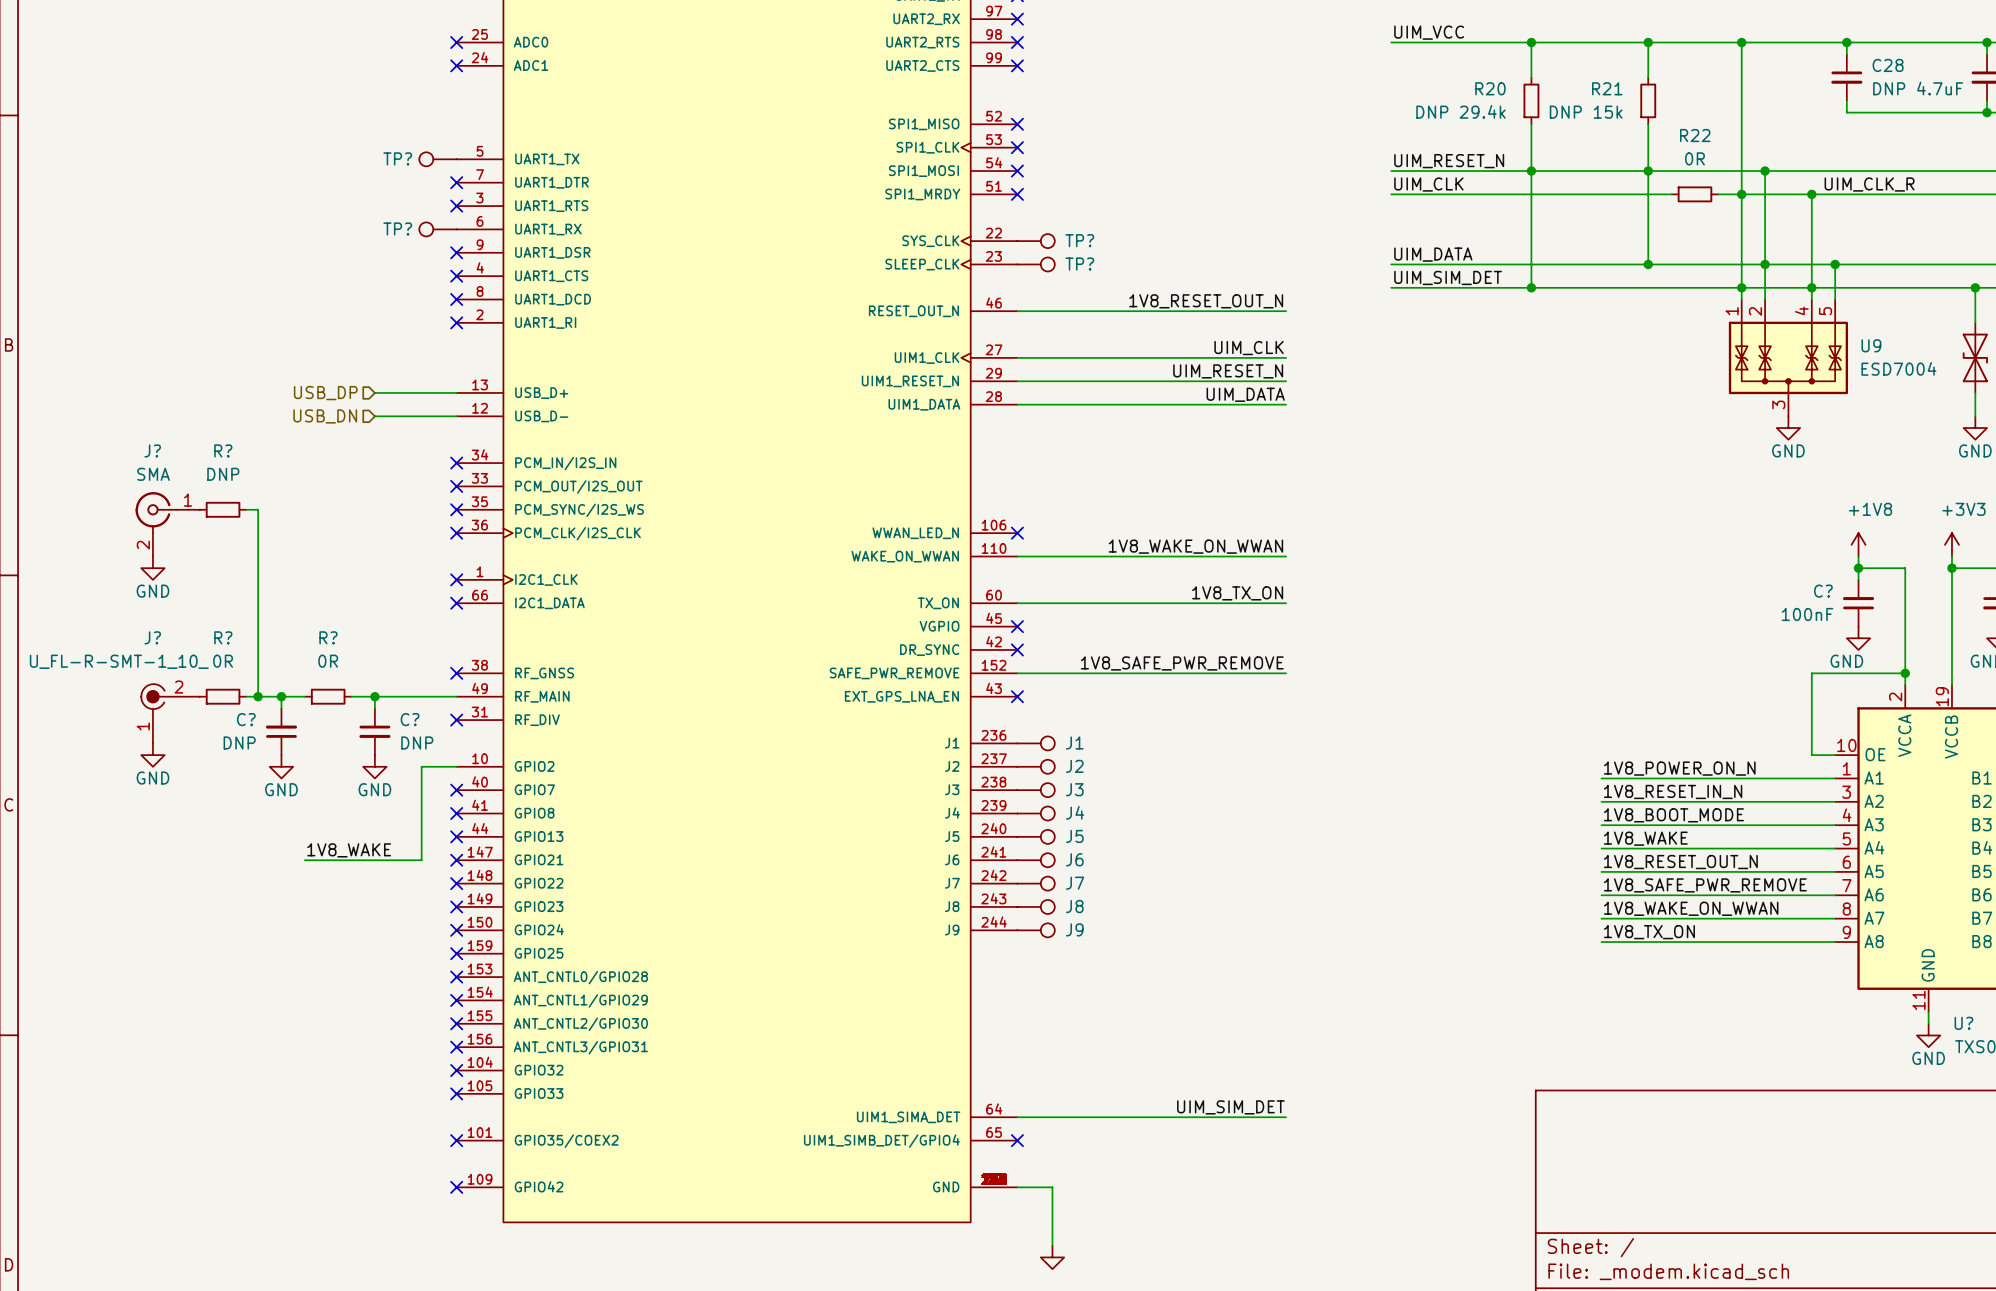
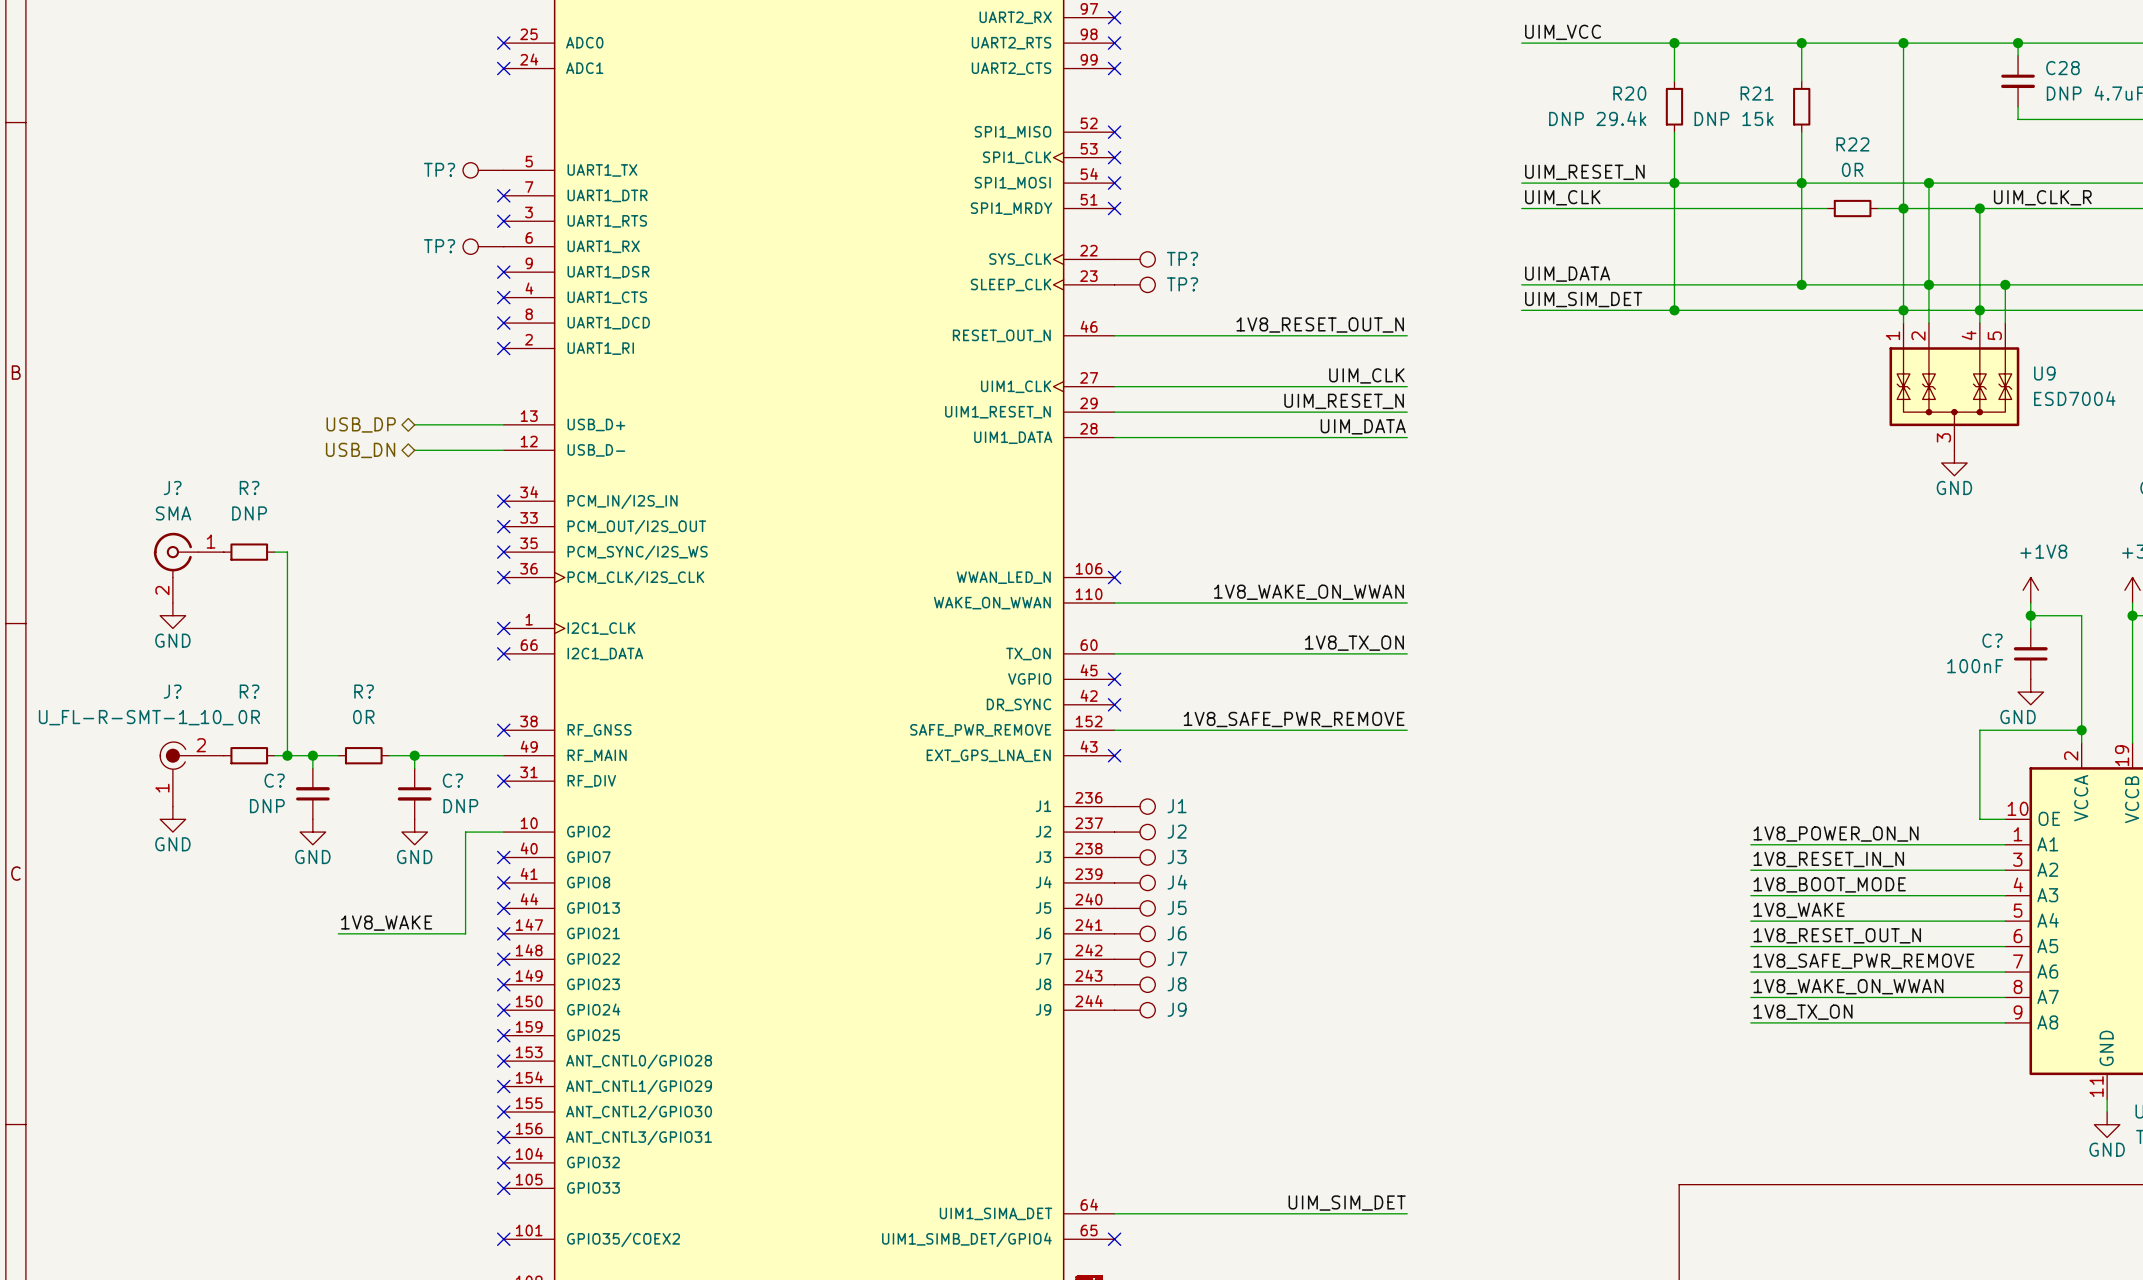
hierarchical label shape: input (325, 393) -> bidirectional (361, 424)
hierarchical label shape: input (325, 416) -> bidirectional (360, 450)

